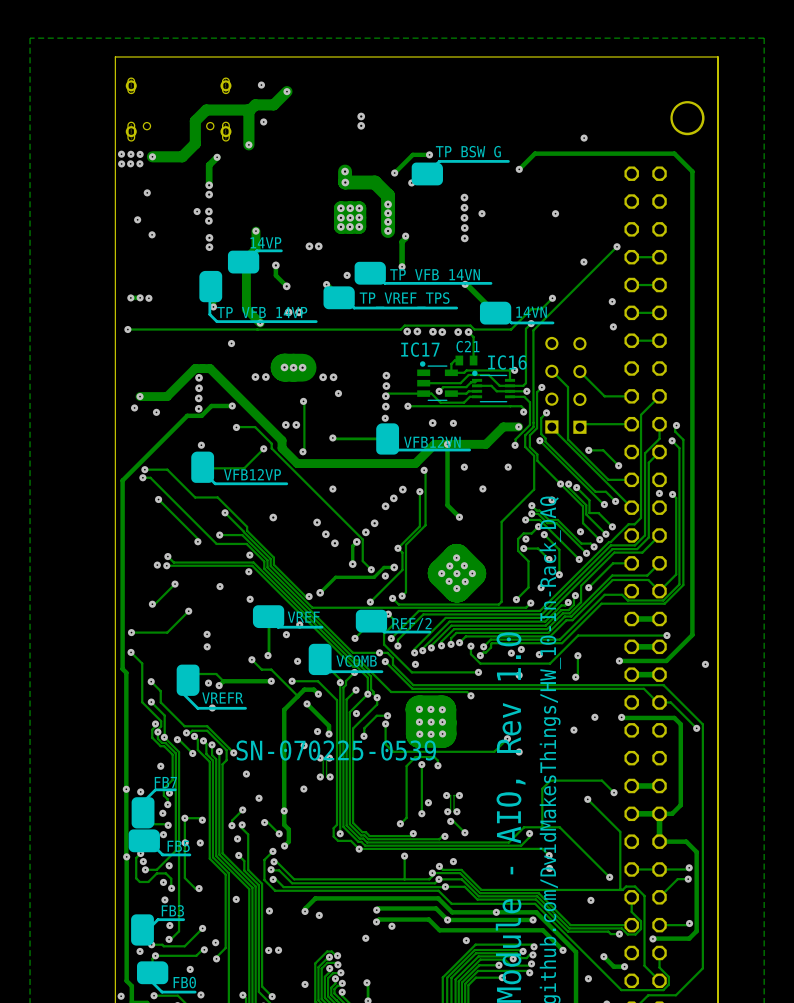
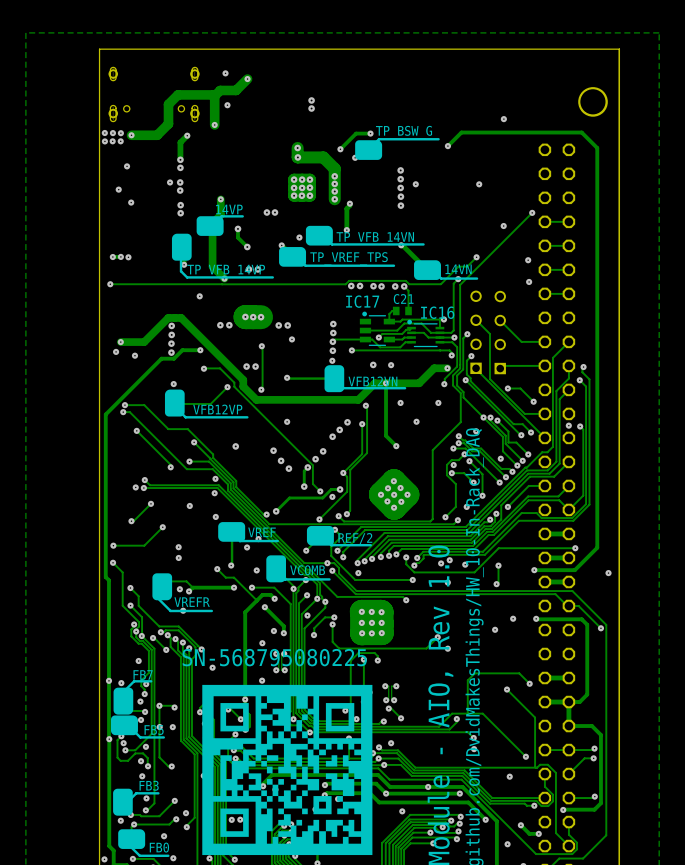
text: SN-070225-0539 (336, 750) -> none
text: none -> SN-568795080225 (274, 657)
drawing: none -> [202, 684, 373, 856]

